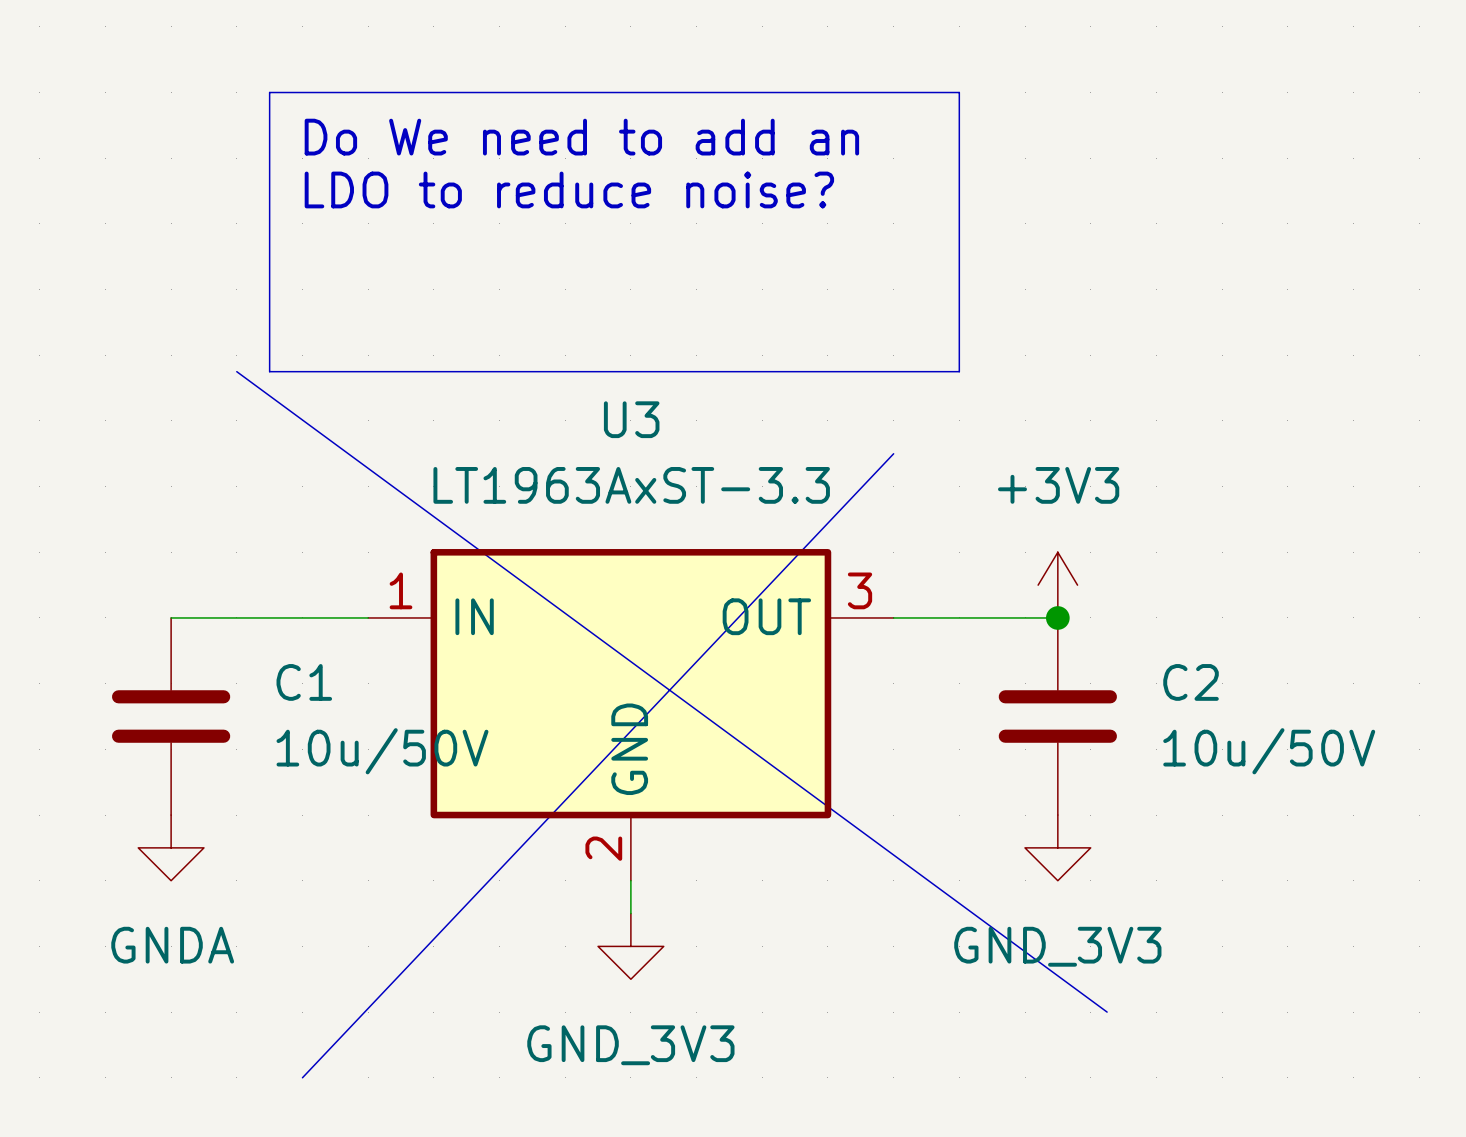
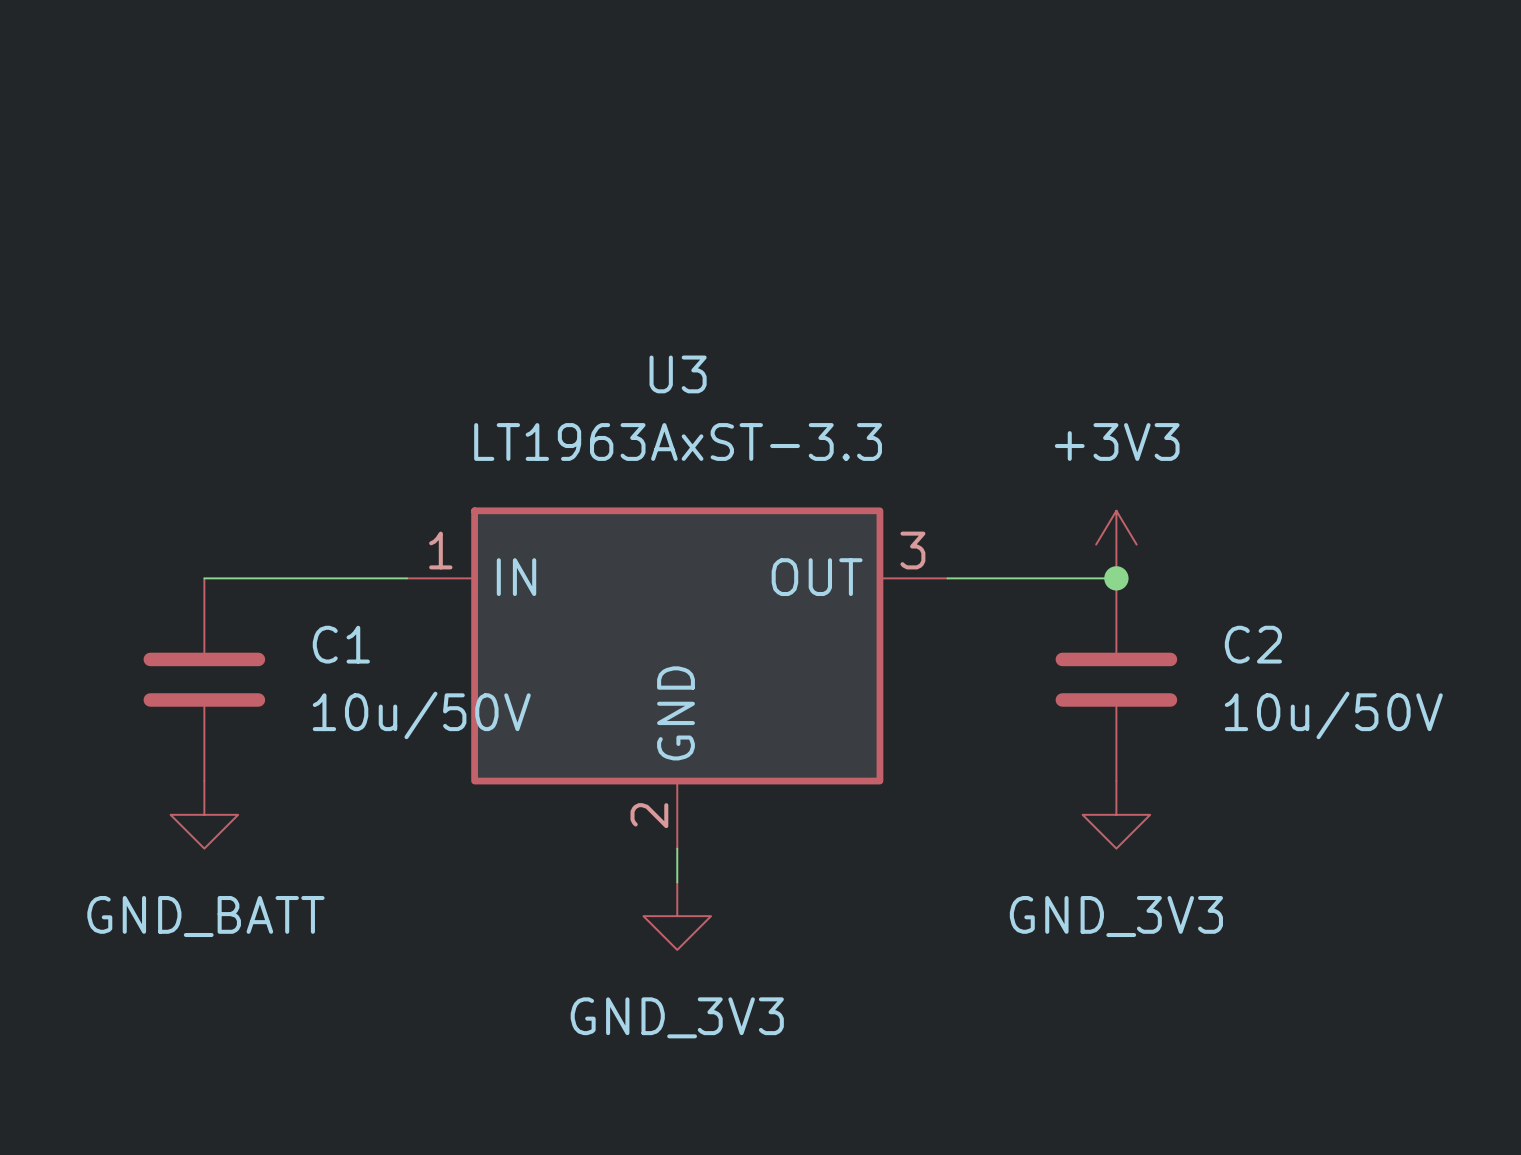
line: (269, 92) (959, 92) (959, 371) (269, 371) (269, 92) -> none
text: Do We need to add an (581, 137) -> none
text: LDO to reduce noise? (569, 189) -> none
line: (236, 371) (1107, 1012) -> none
line: (893, 453) (302, 1077) -> none
power symbol: GNDA (171, 847) -> GND_BATT (204, 814)

